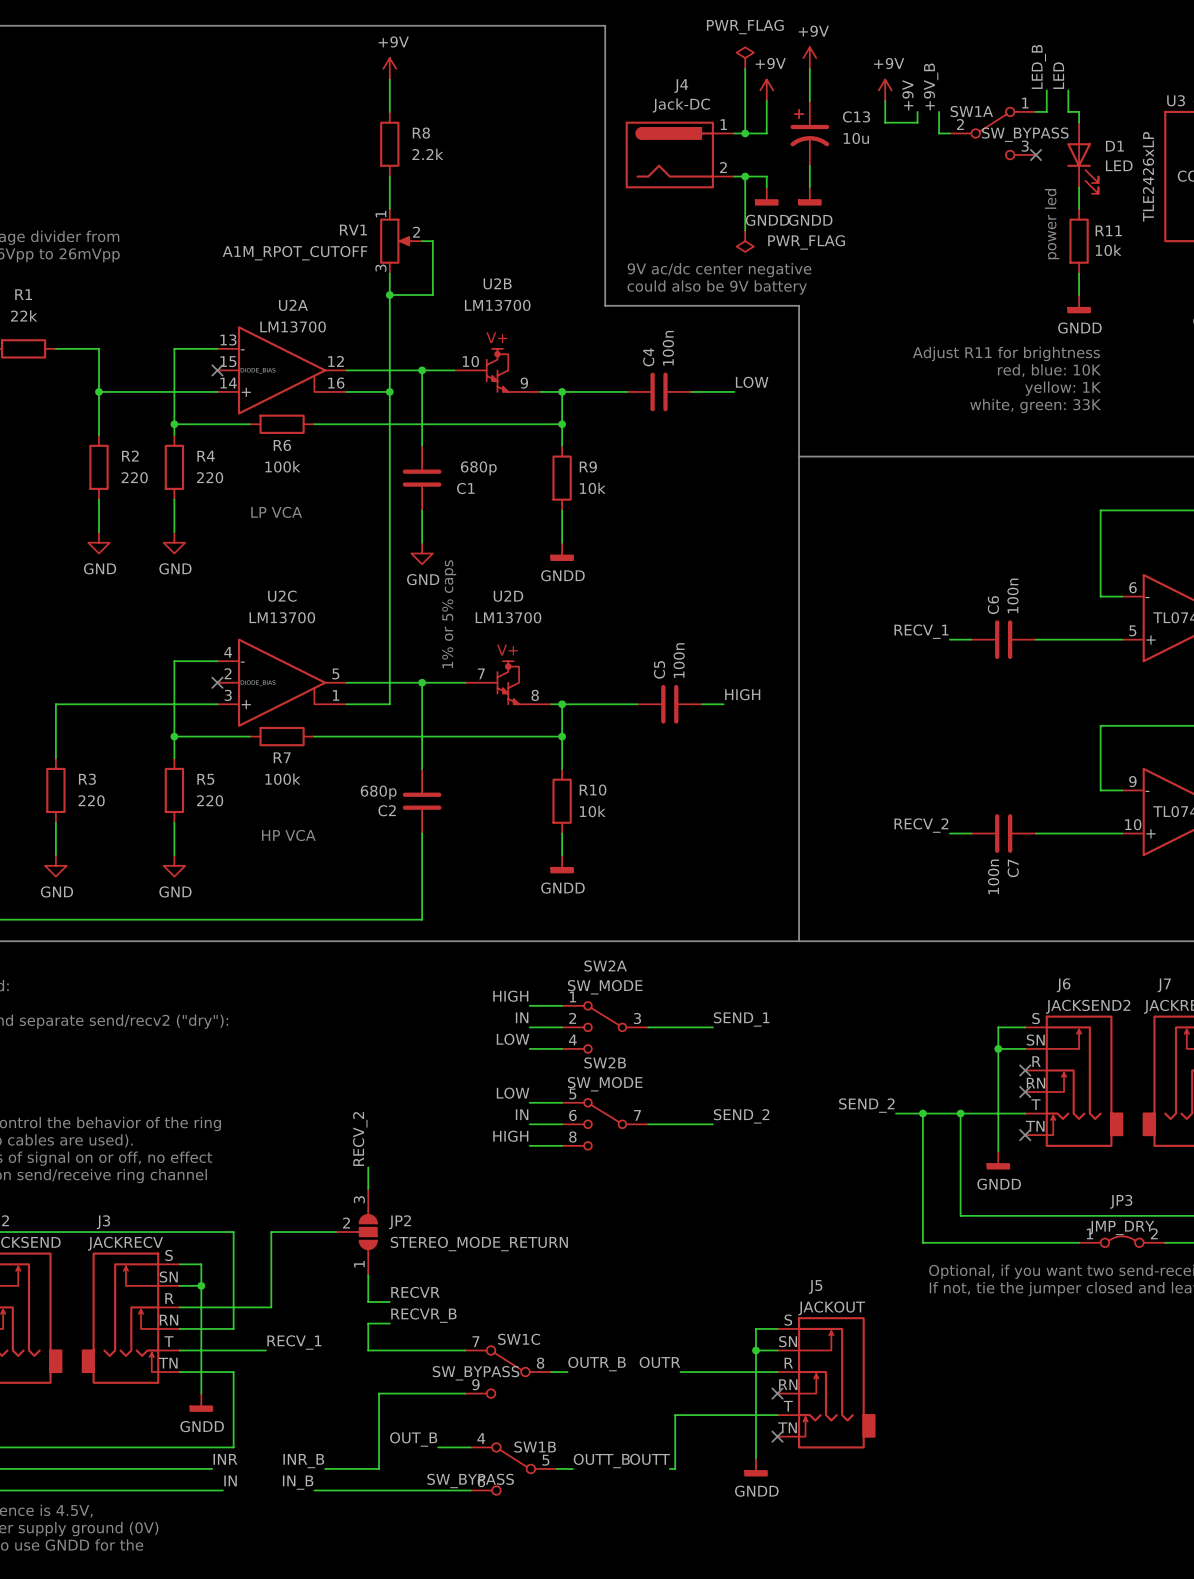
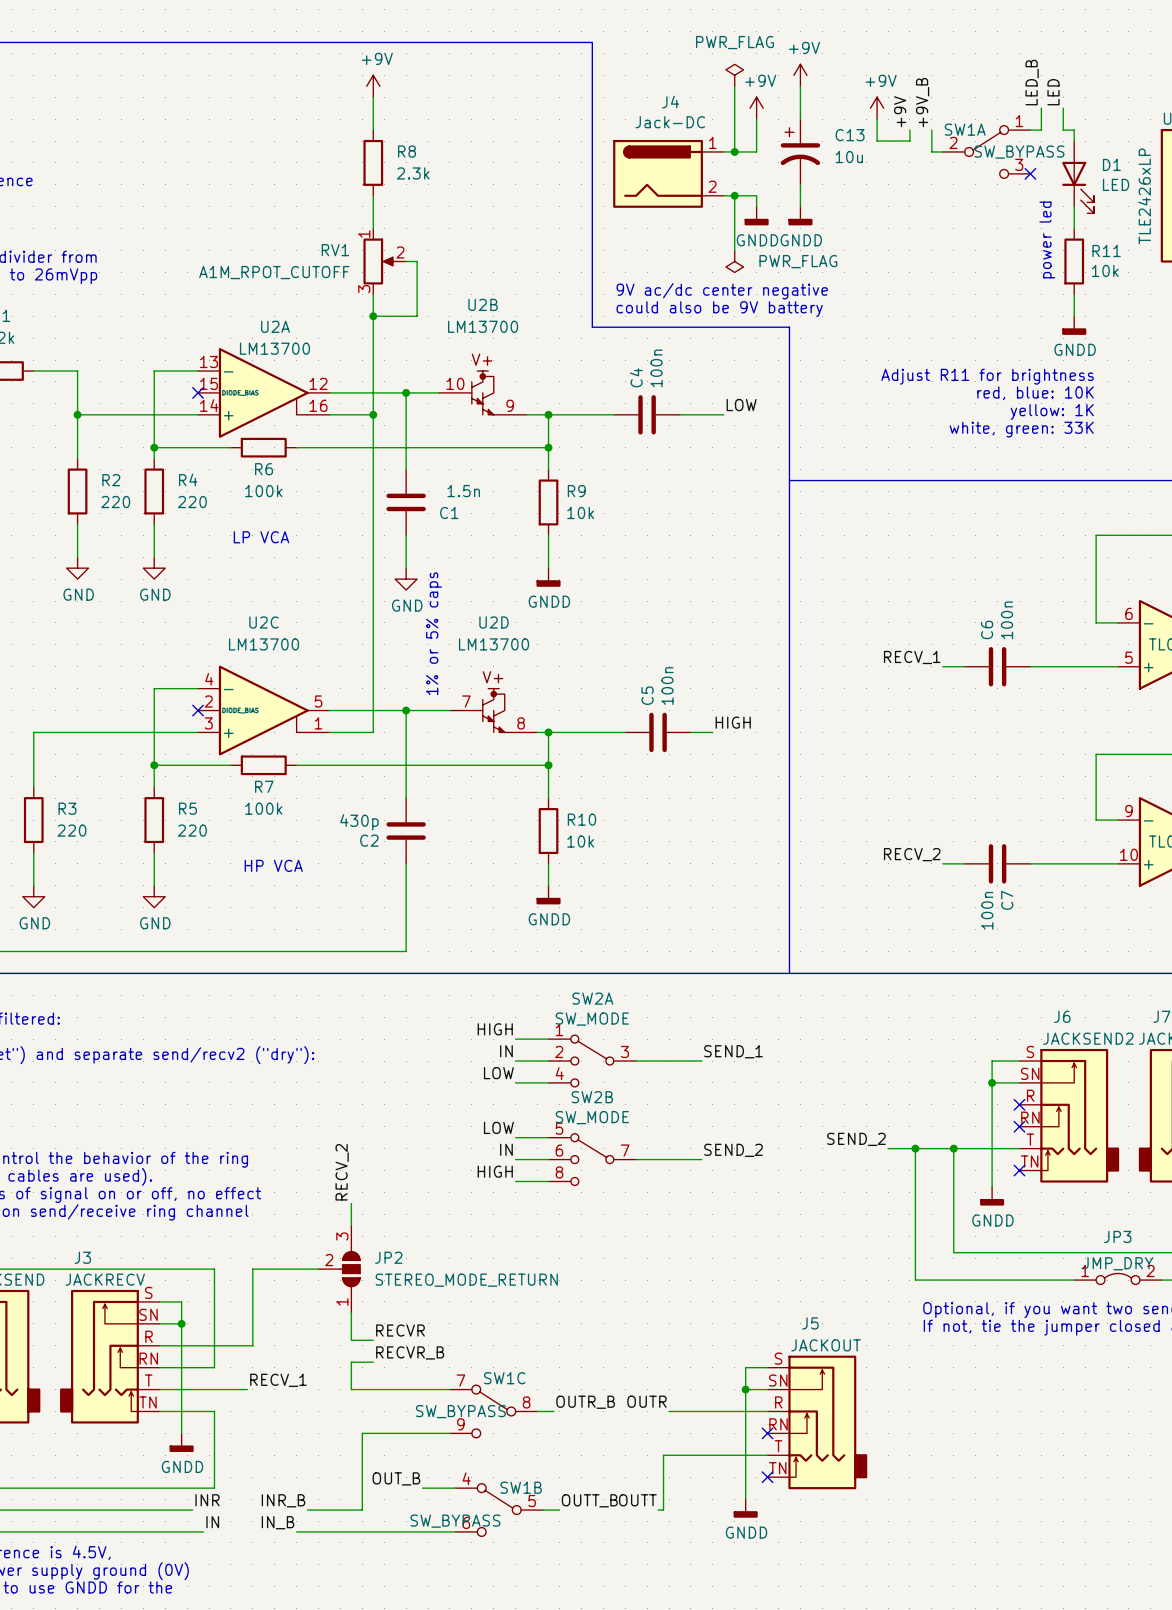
R8 value: 2.2k (427, 154) -> 2.3k (413, 173)
C1 value: 680p (478, 468) -> 1.5n (463, 491)
C2 value: 680p (378, 792) -> 430p (359, 822)

